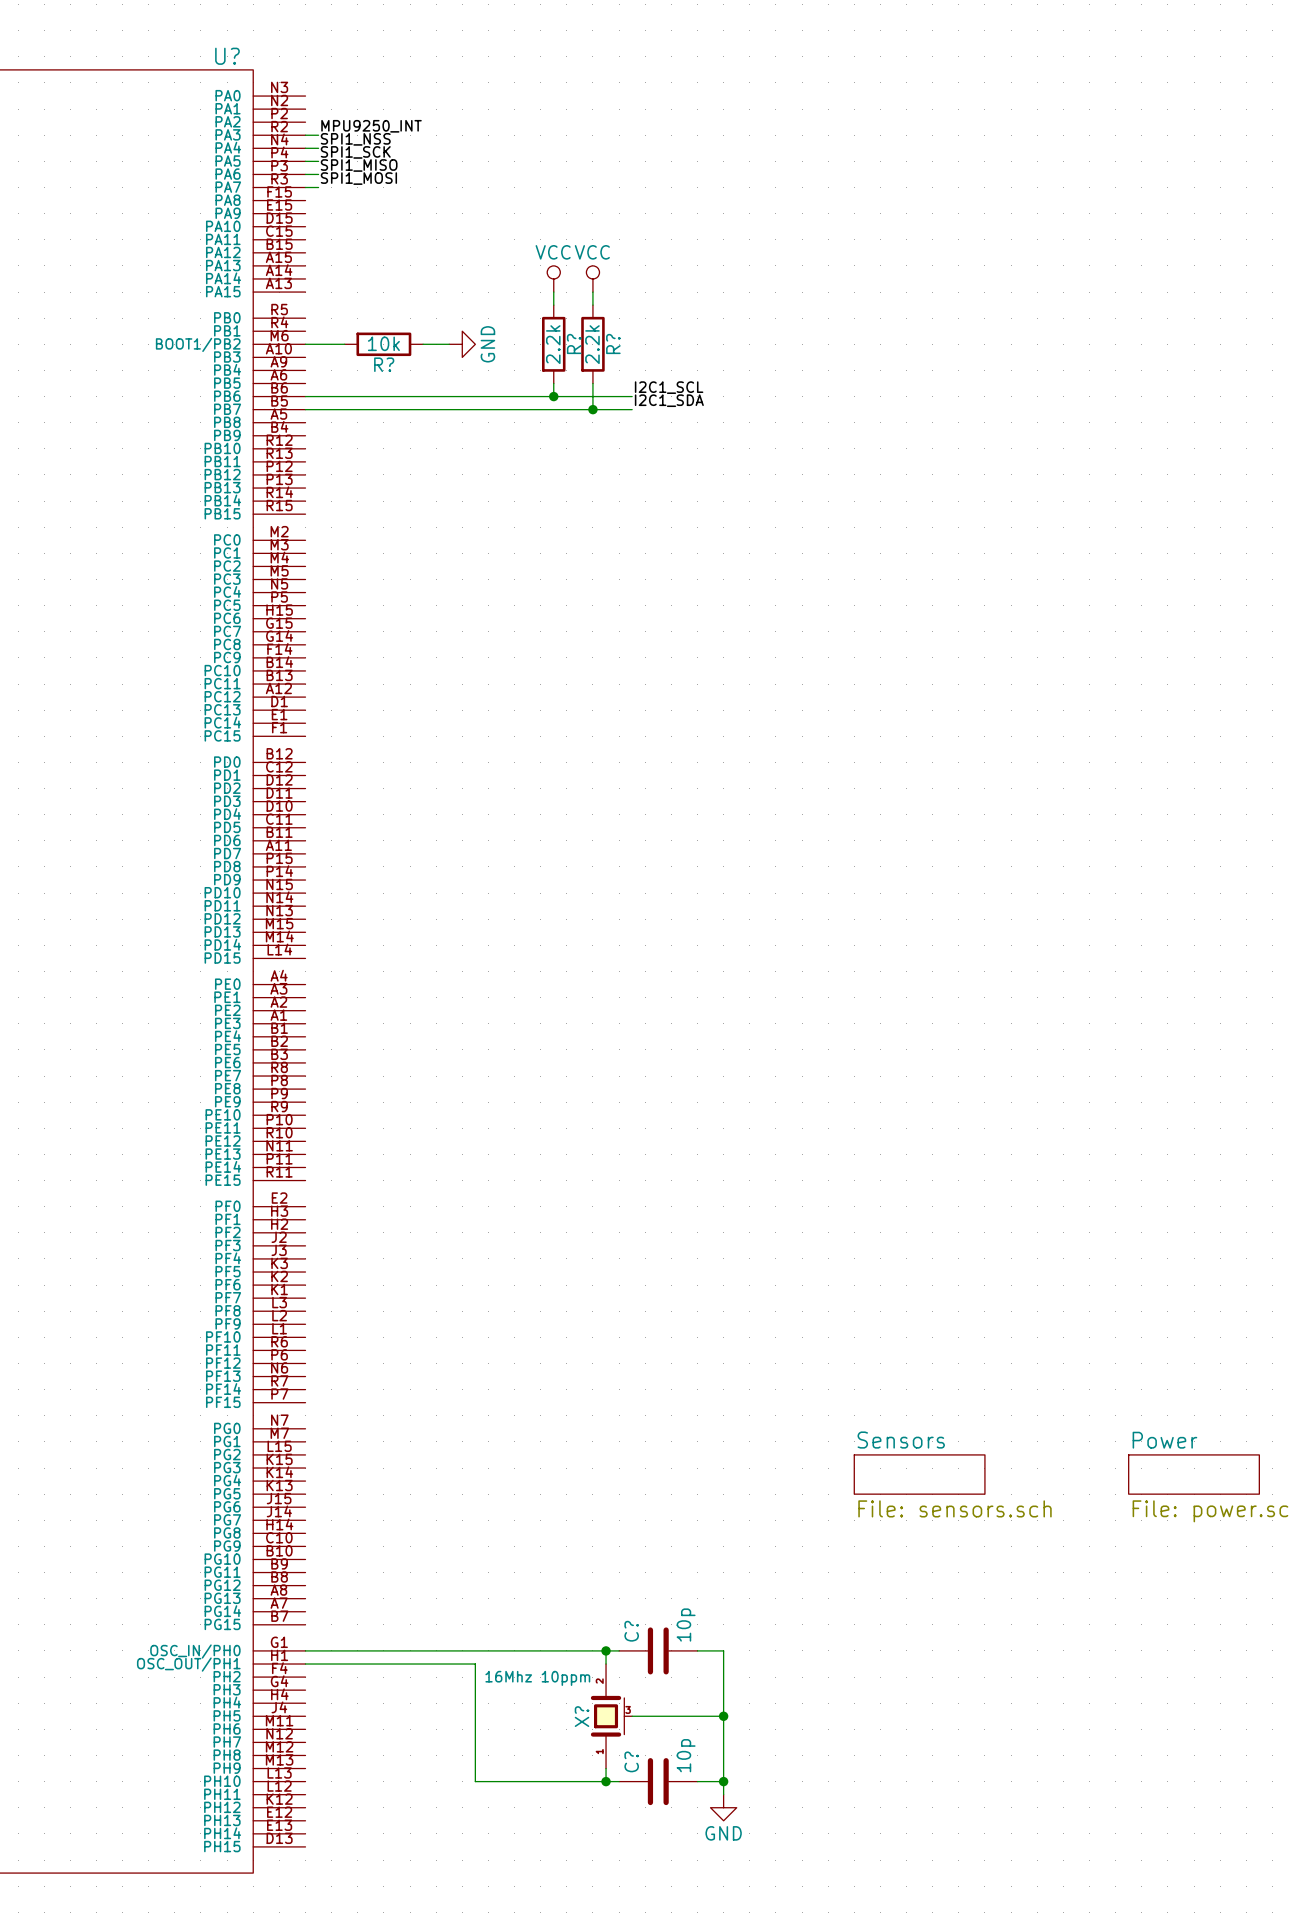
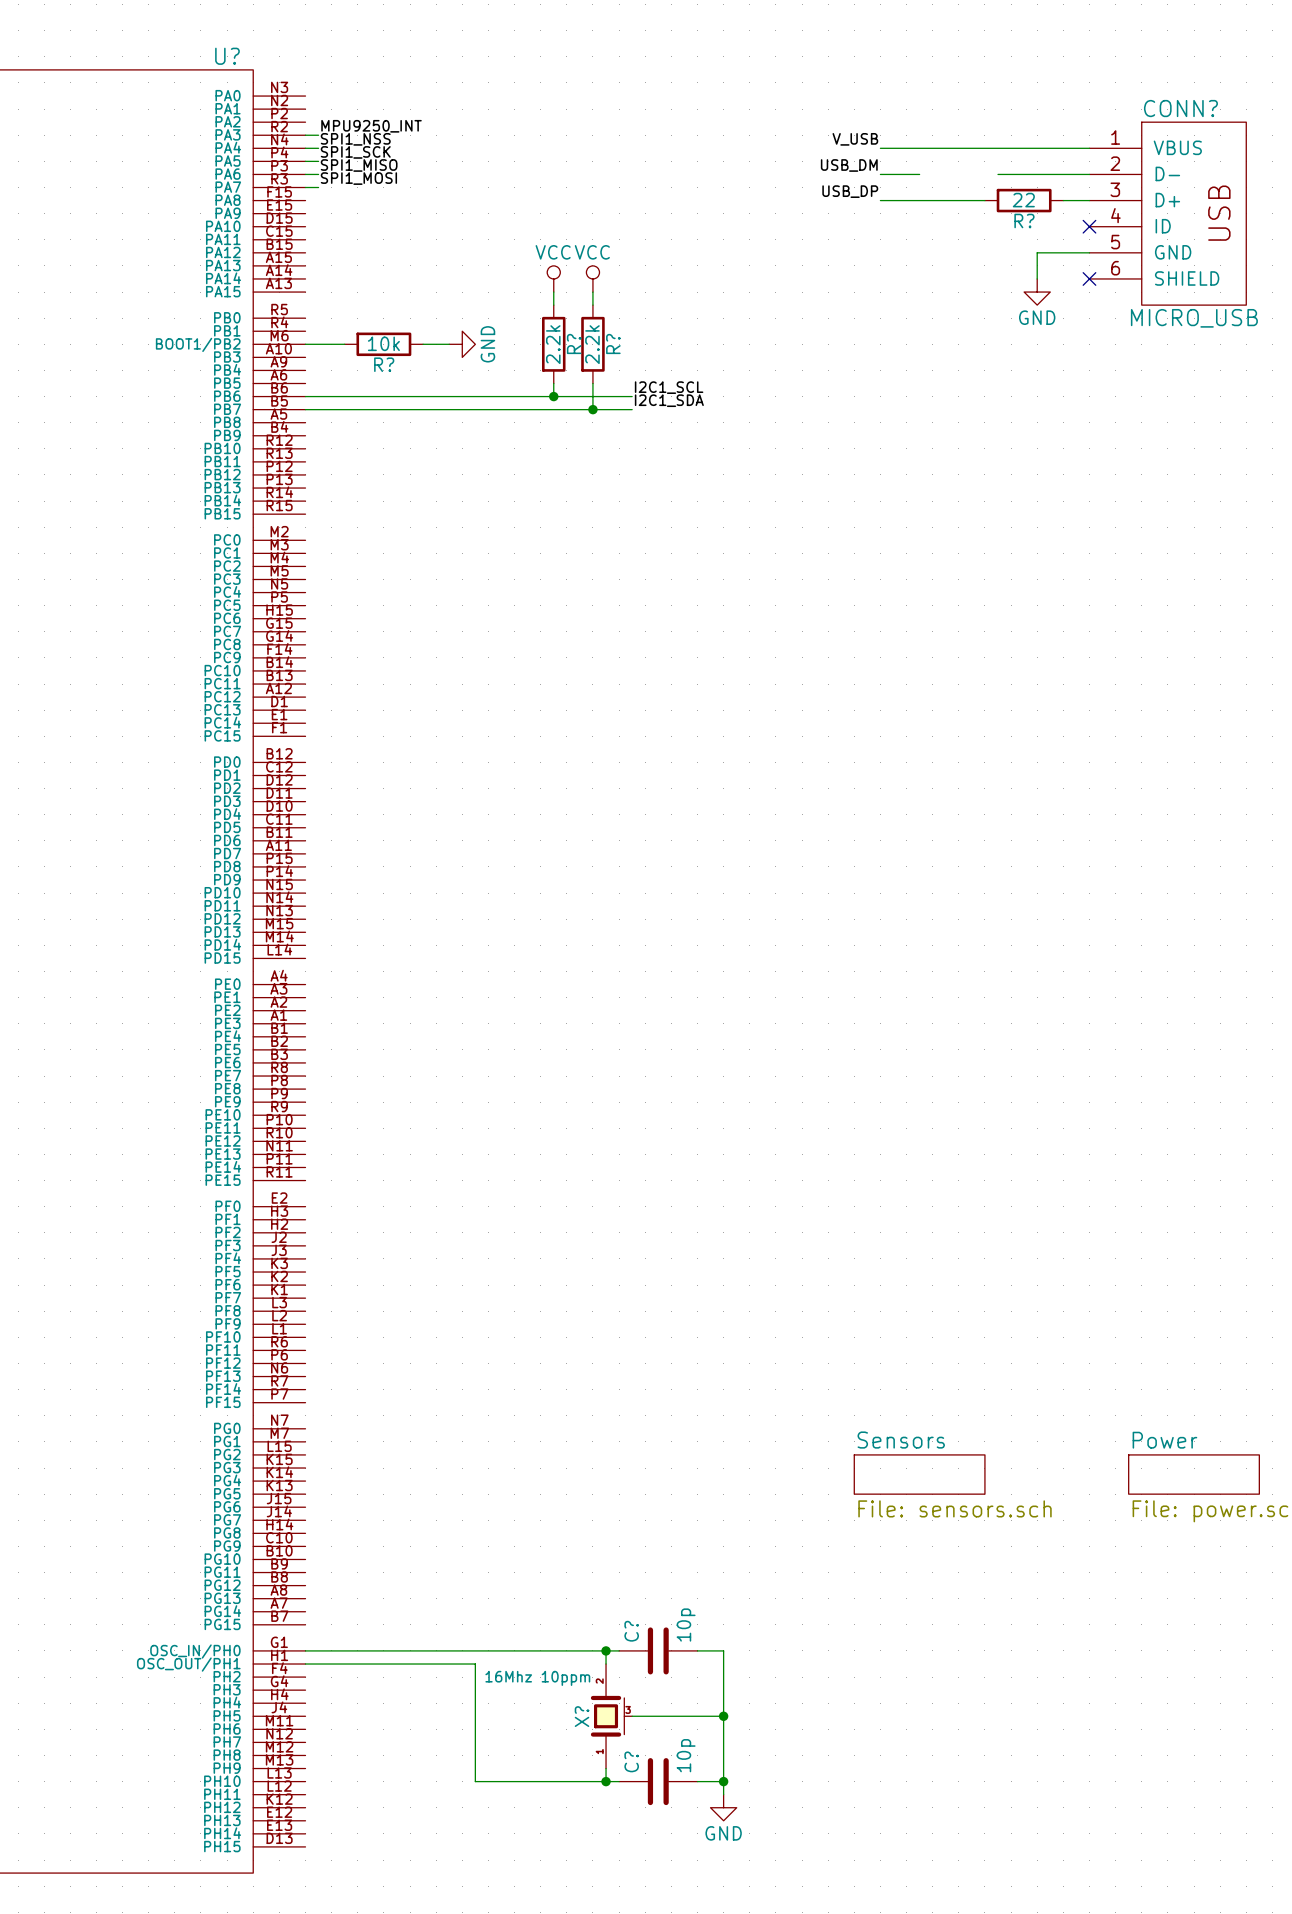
label: none -> V_USB (855, 139)
wire: none -> (880, 148) (1089, 148)
label: none -> USB_DM (849, 165)
wire: none -> (880, 174) (919, 174)
wire: none -> (998, 174) (1089, 174)
label: none -> USB_DP (850, 191)
wire: none -> (880, 200) (984, 200)
R?: none -> 22 (1024, 200)
wire: none -> (1063, 200) (1089, 200)
CONN?: none -> MICRO_USB (1167, 213)
no-connect mark: none -> (1089, 226)
wire: none -> (1089, 252) (1037, 252) (1037, 278)
no-connect mark: none -> (1089, 278)
power symbol: none -> GND (1037, 292)

